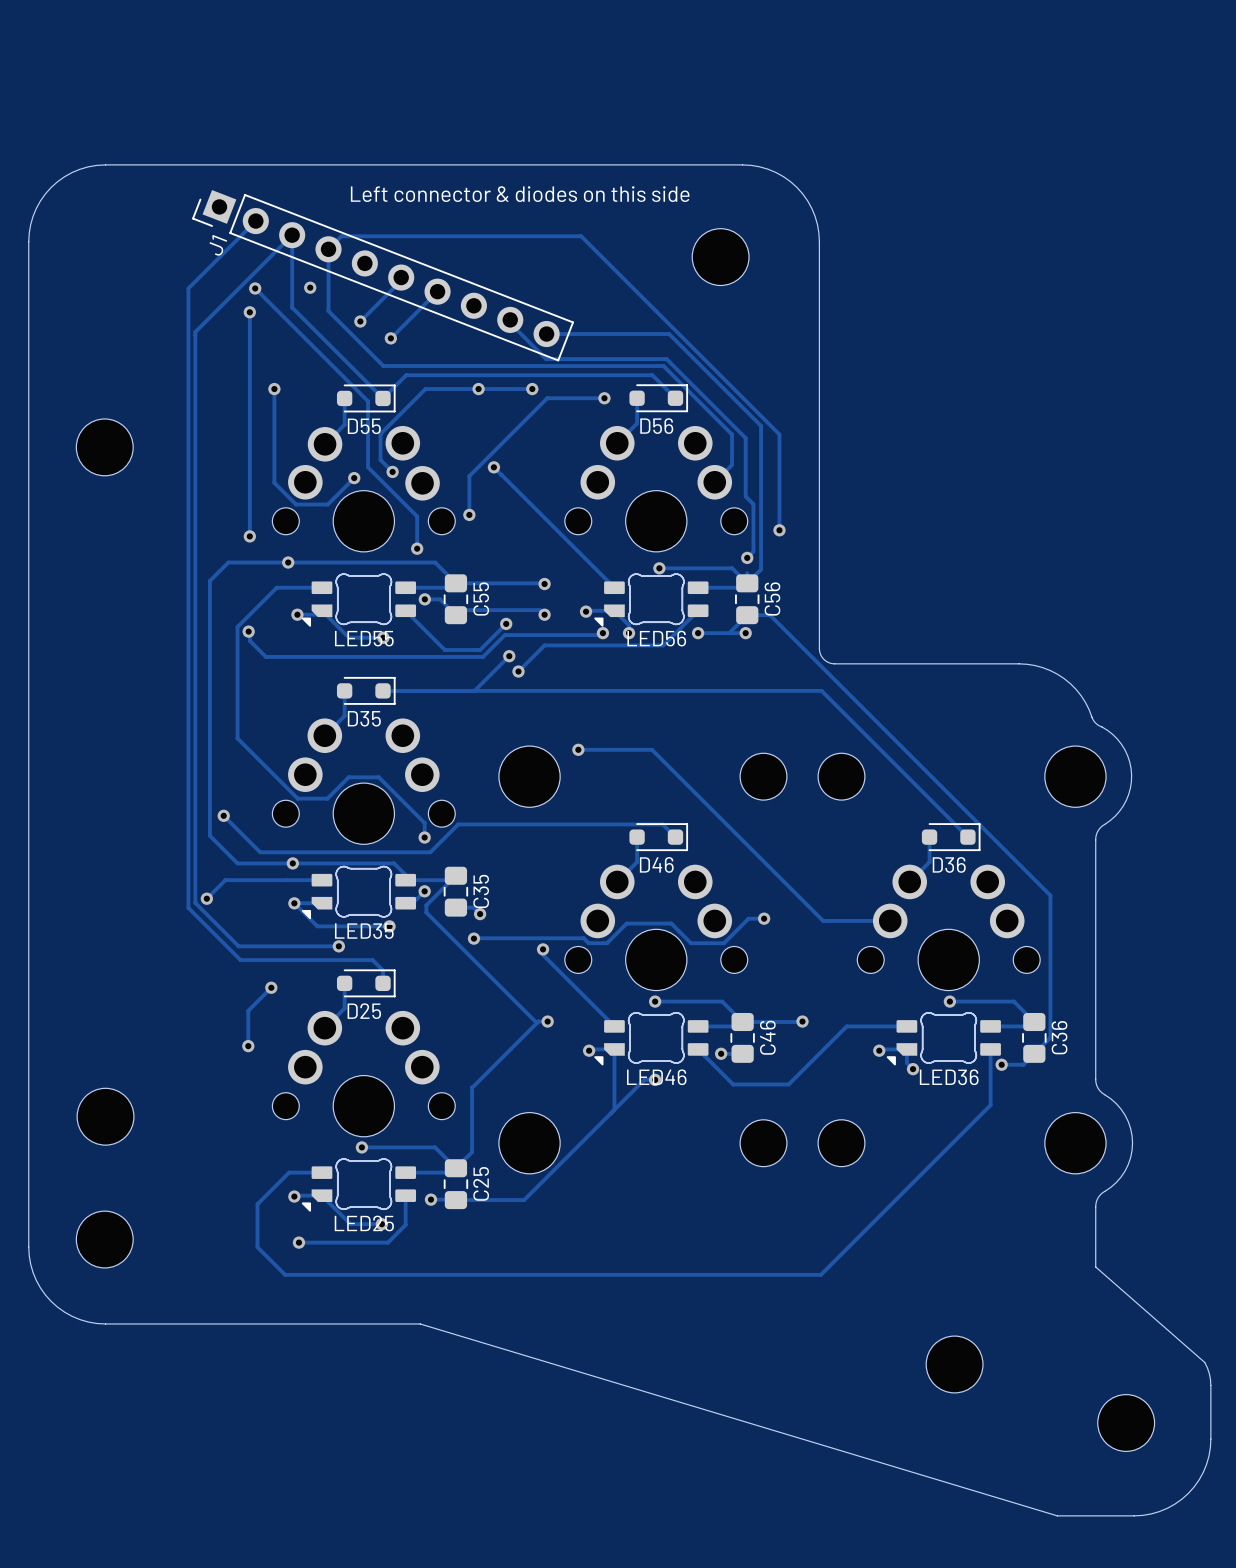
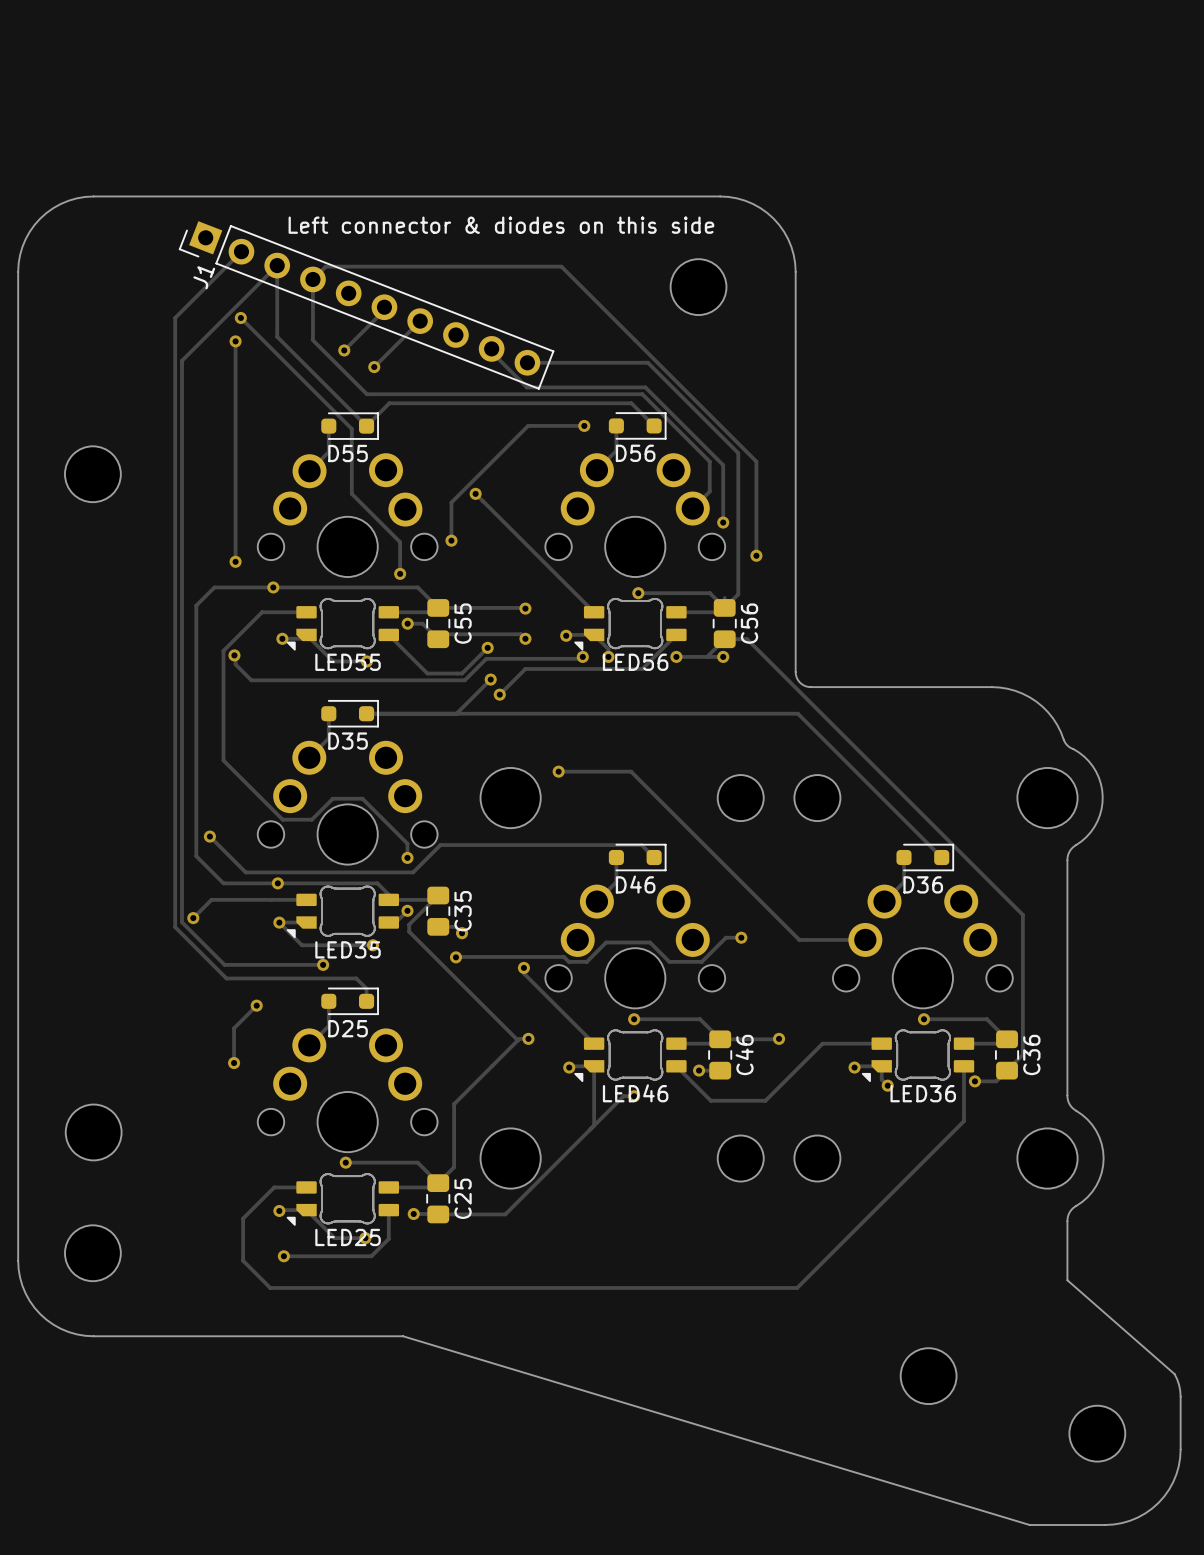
via: (310, 287) -> none
track: (274, 389) (274, 482) (296, 504) (327, 504) (354, 478) -> none
via: (274, 389) -> none
via: (478, 389) -> none
track: (532, 389) (425, 389) (380, 434) (380, 459) (392, 471) -> none
via: (532, 389) -> none
via: (392, 471) -> none
via: (354, 478) -> none
track: (745, 496) (753, 504) (753, 551) (747, 557) -> none
via position: (747, 557) -> (723, 522)

